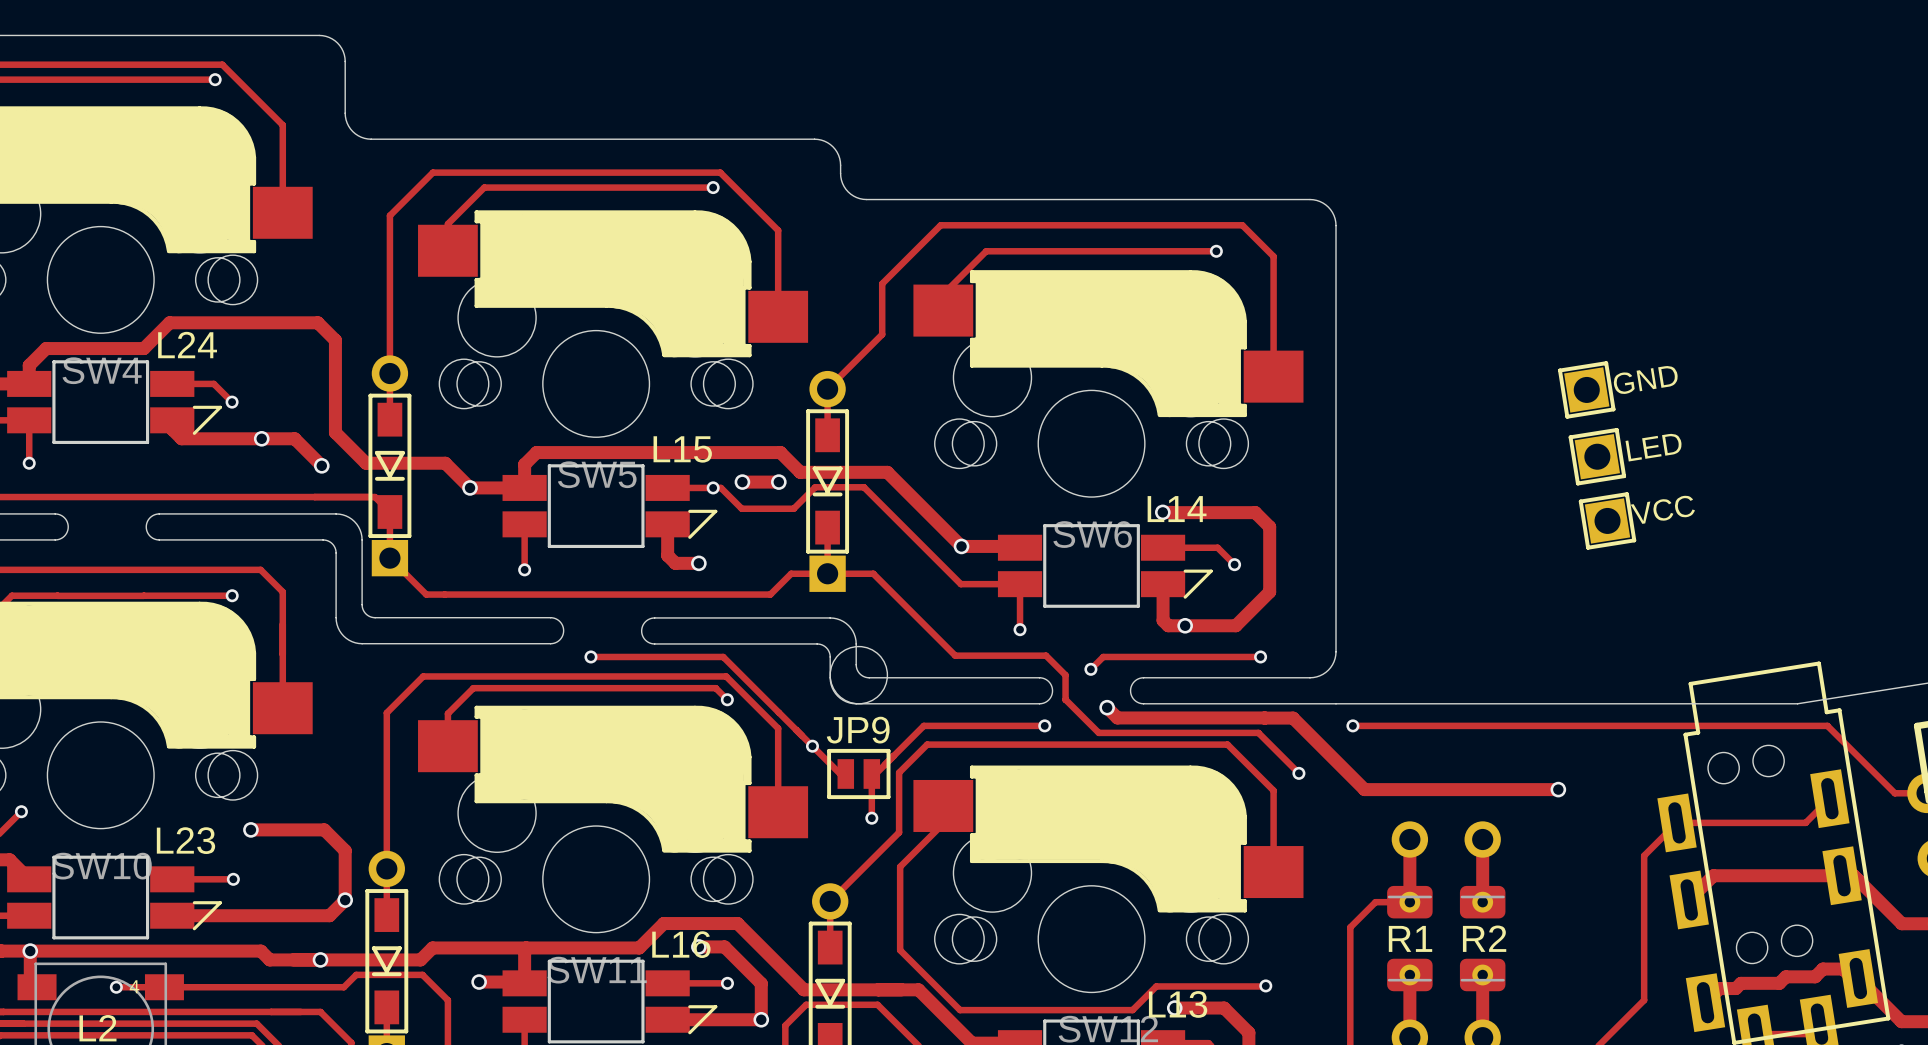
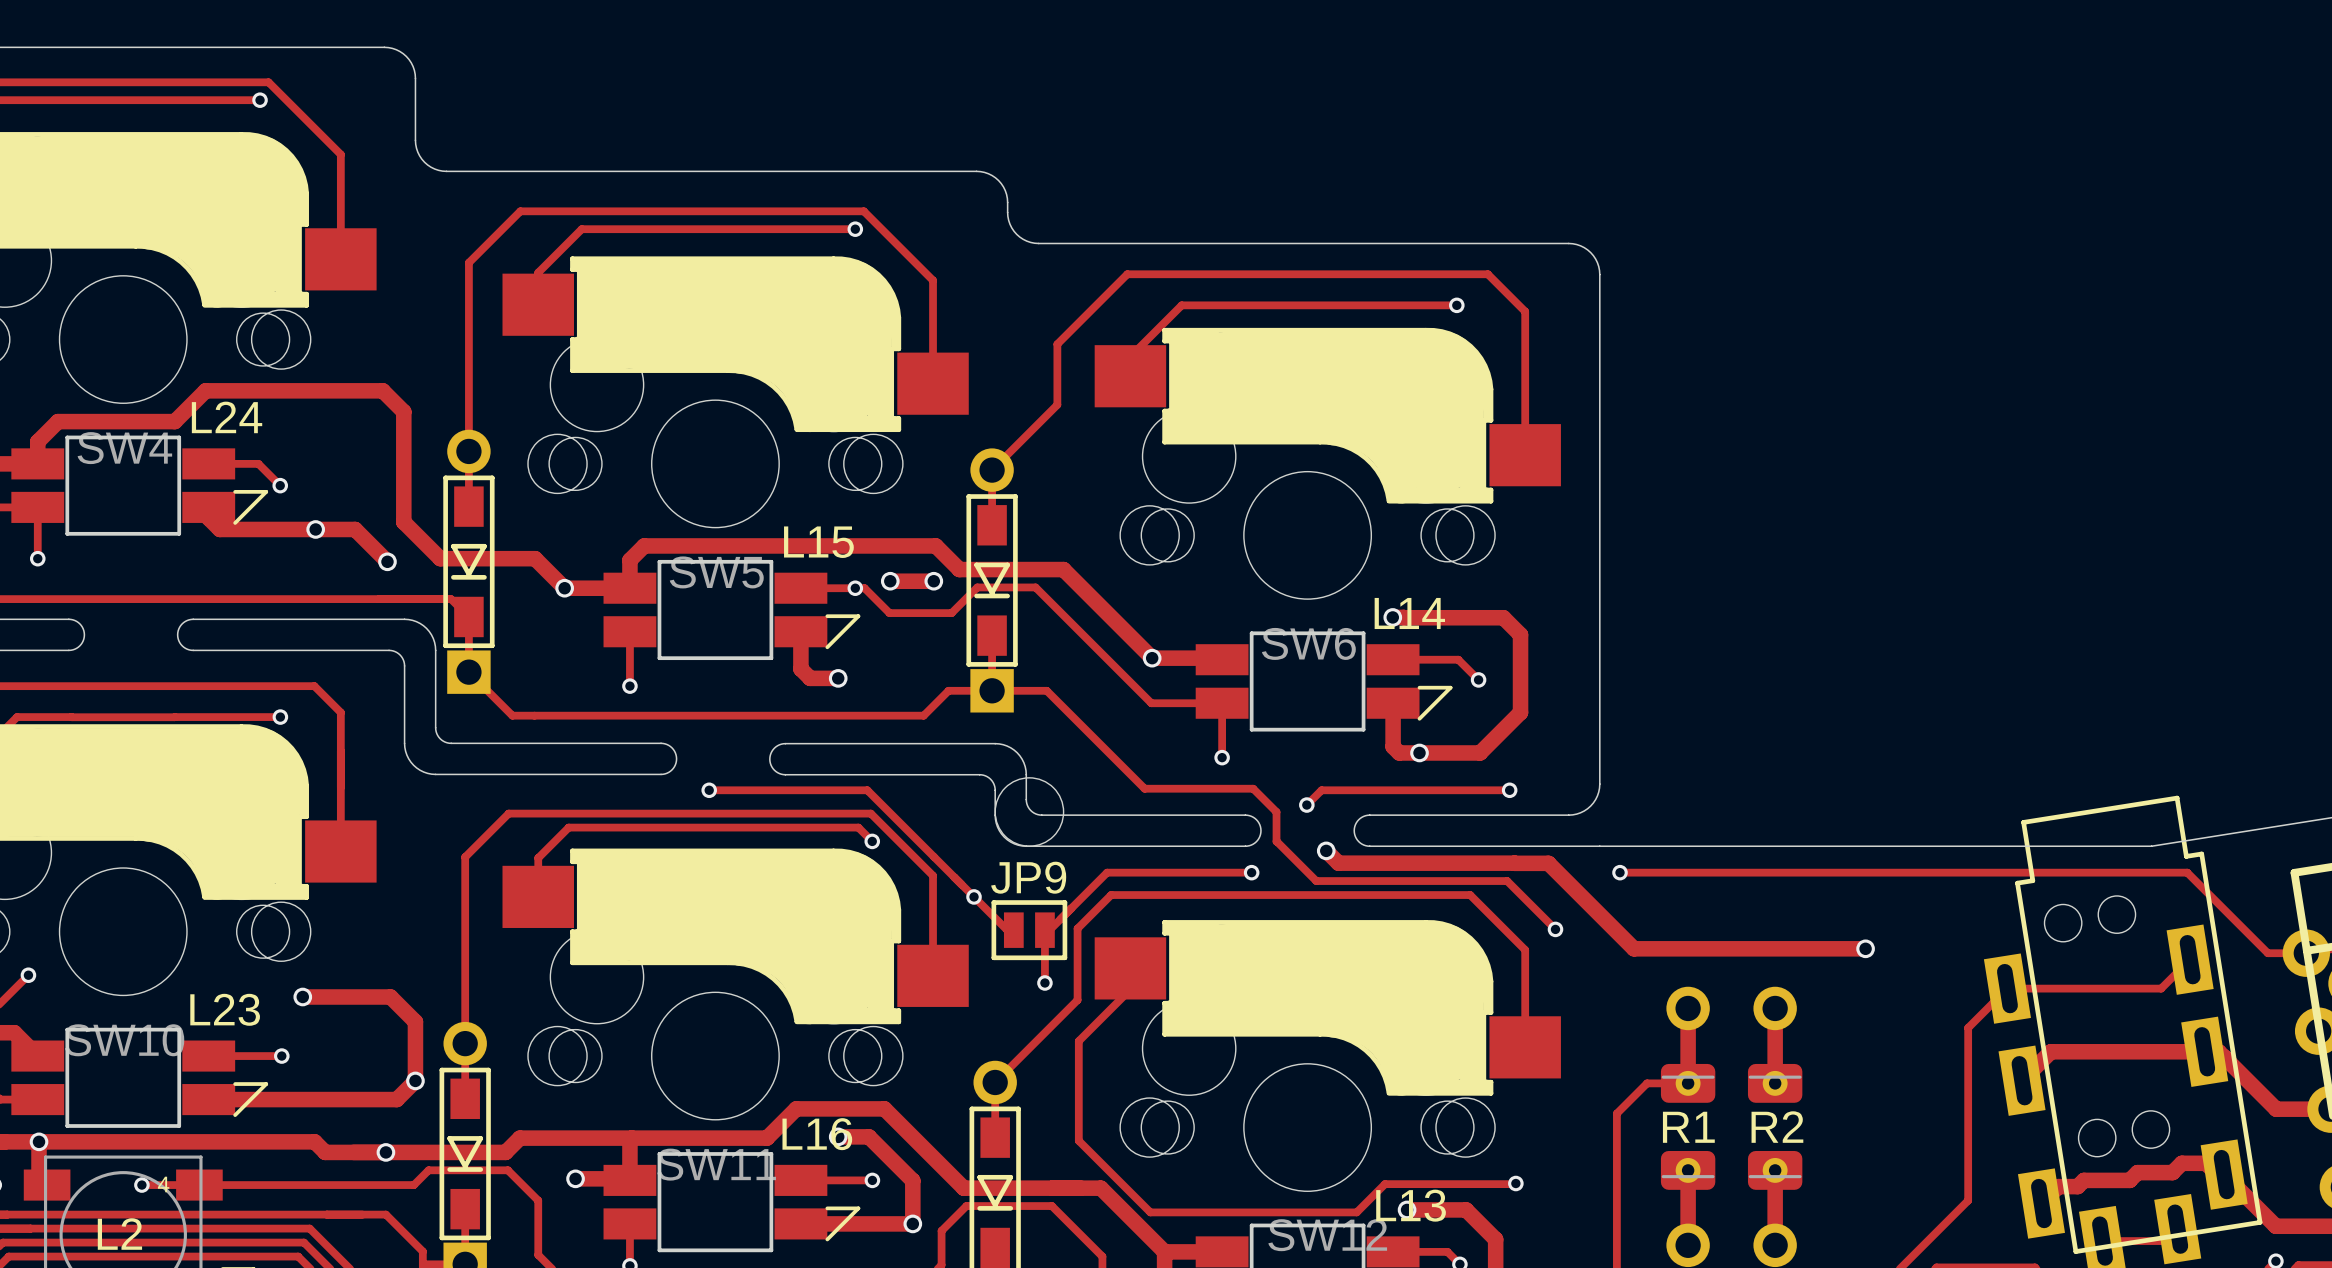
part: (1597, 455) -> none

